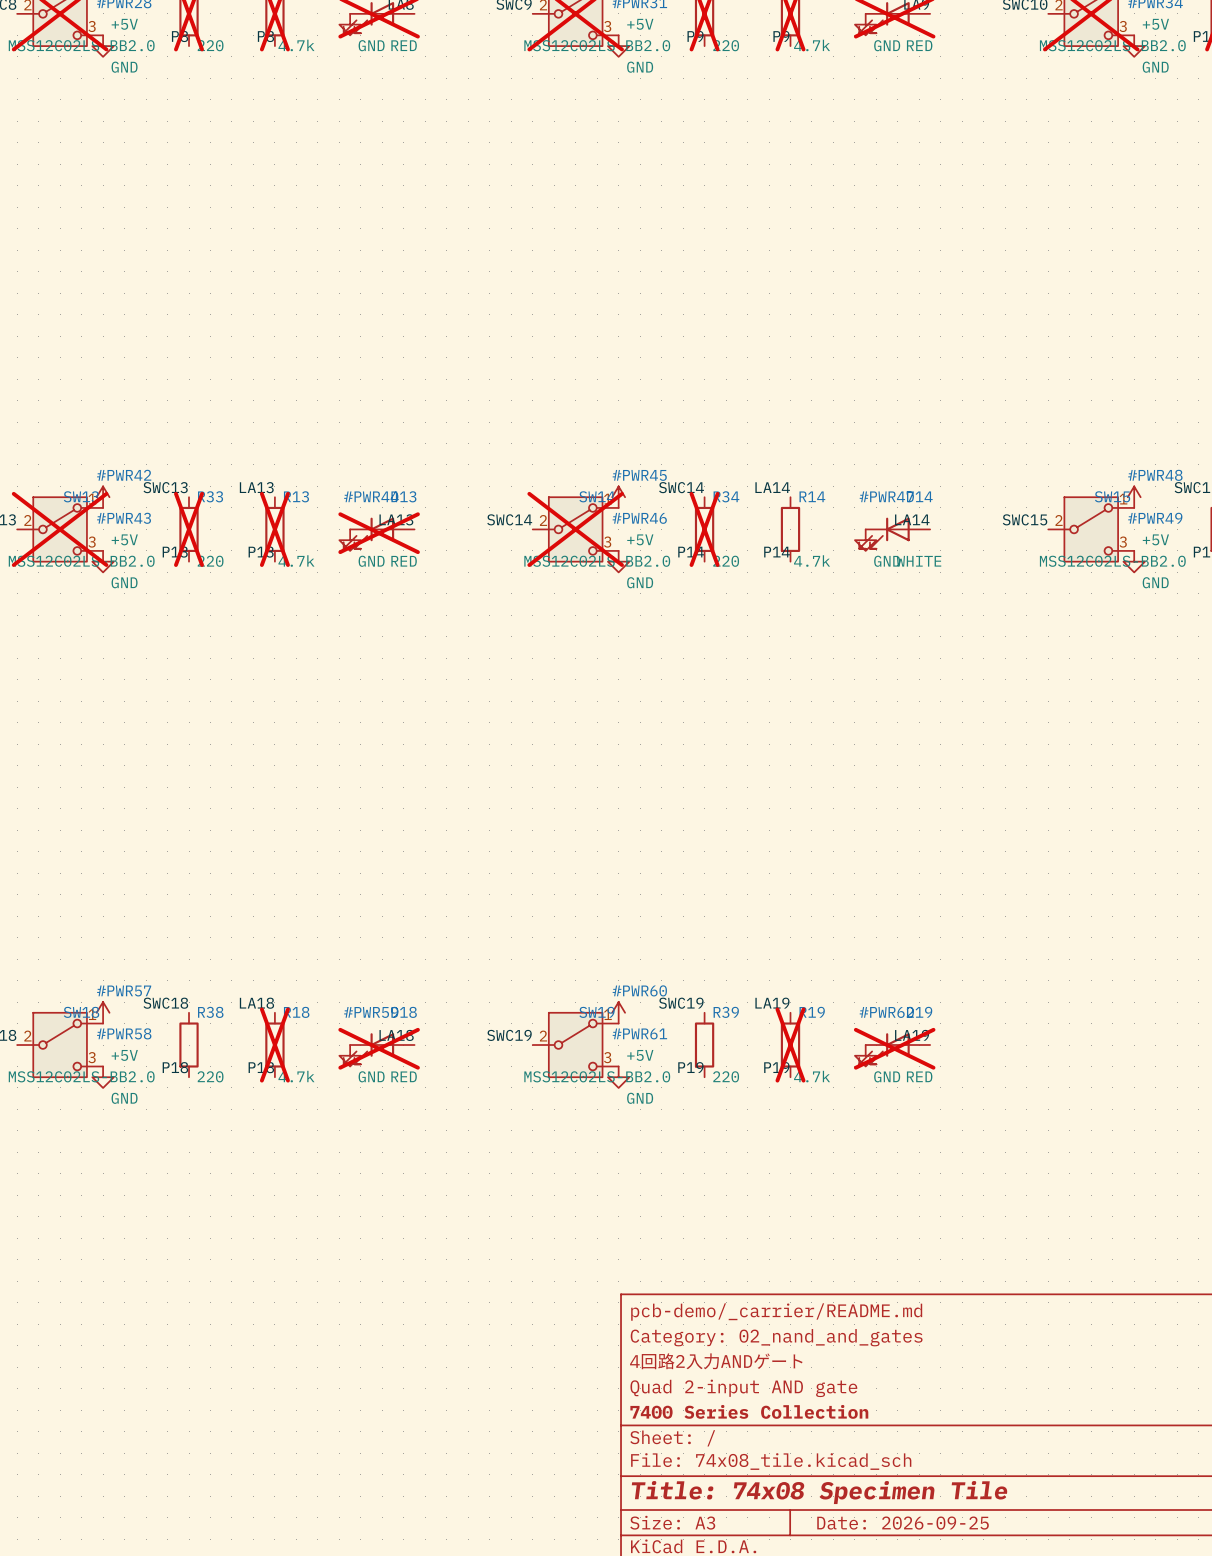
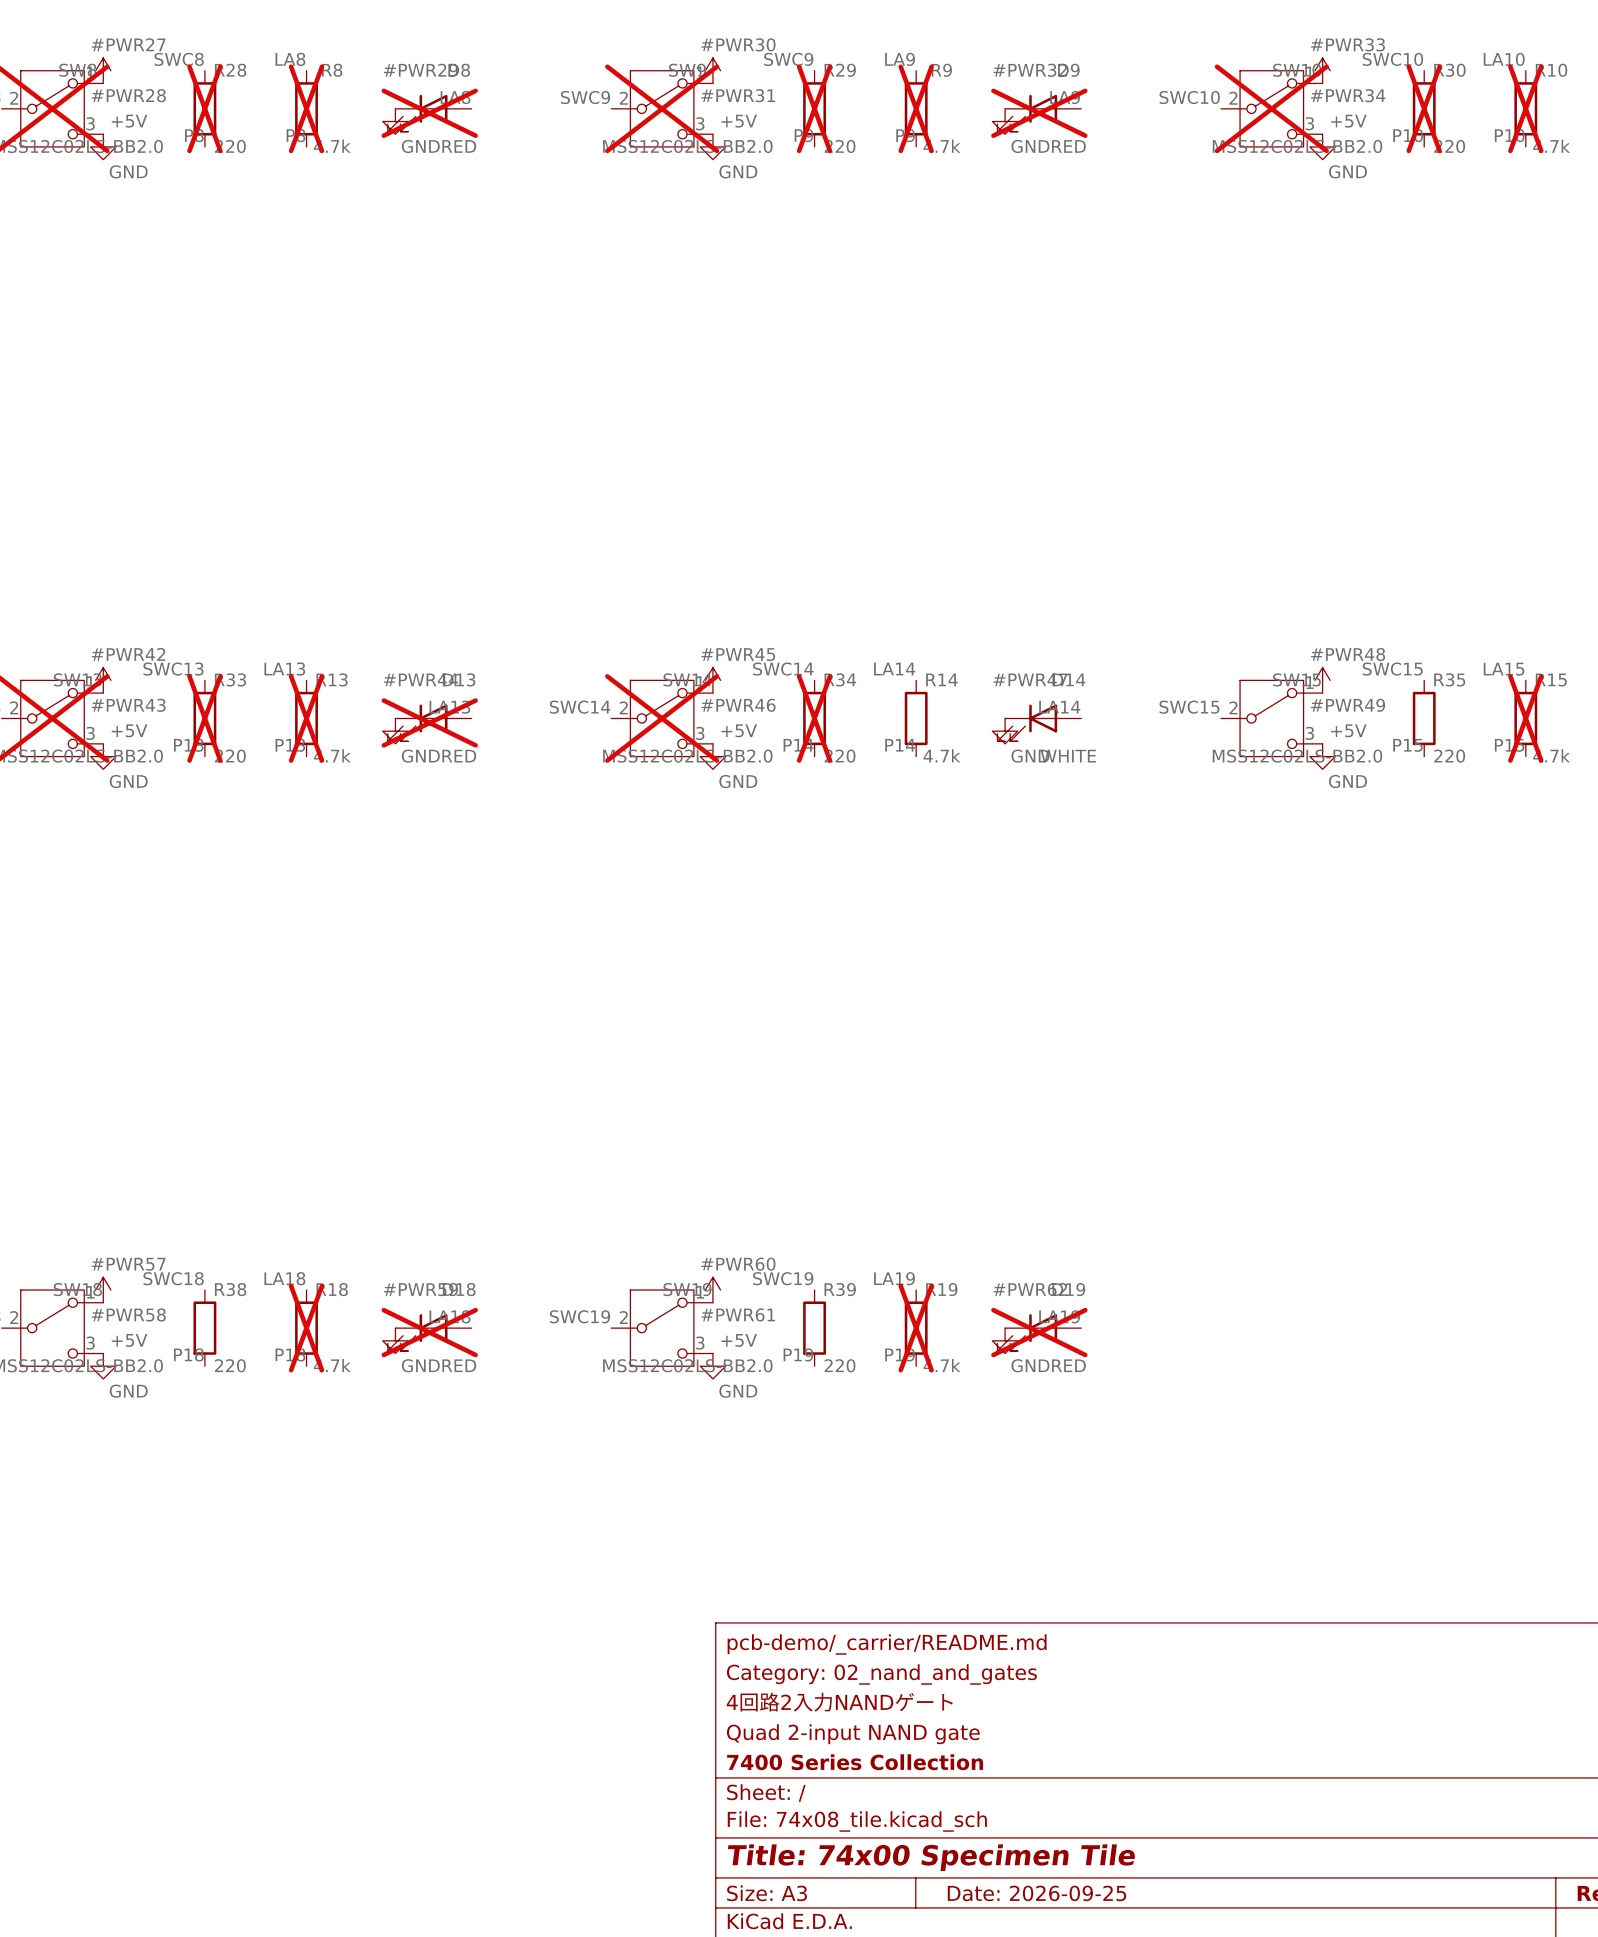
title block: 4回路2入力ANDゲート (716, 1361) -> 4回路2入力NANDゲート (839, 1702)
title block: Quad 2-input AND gate (743, 1388) -> Quad 2-input NAND gate (853, 1734)
title block: Title: 74x08 Specimen Tile (819, 1492) -> Title: 74x00 Specimen Tile (931, 1857)

